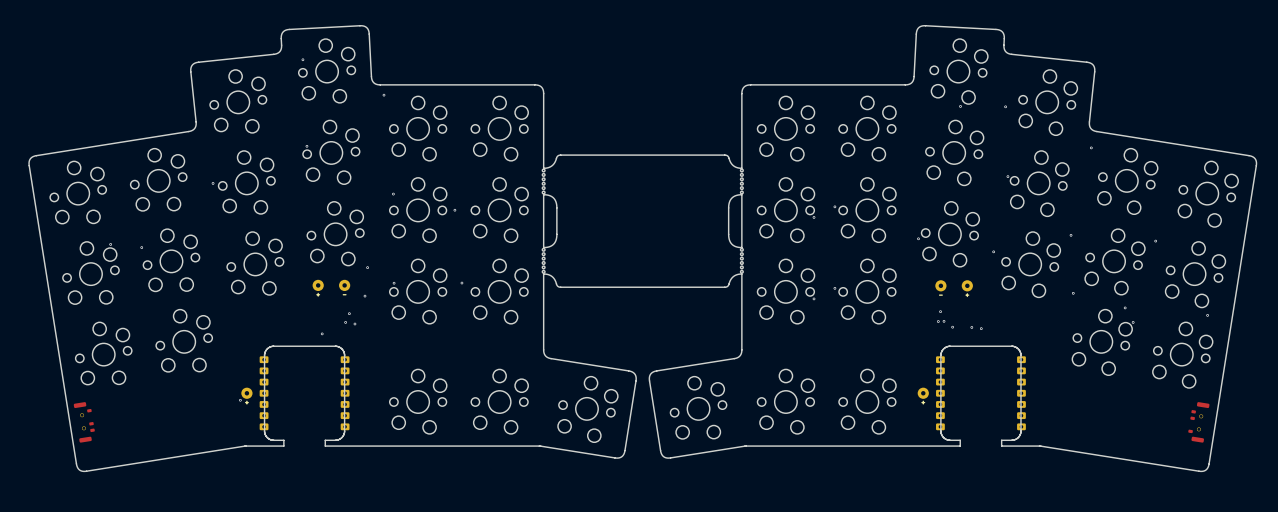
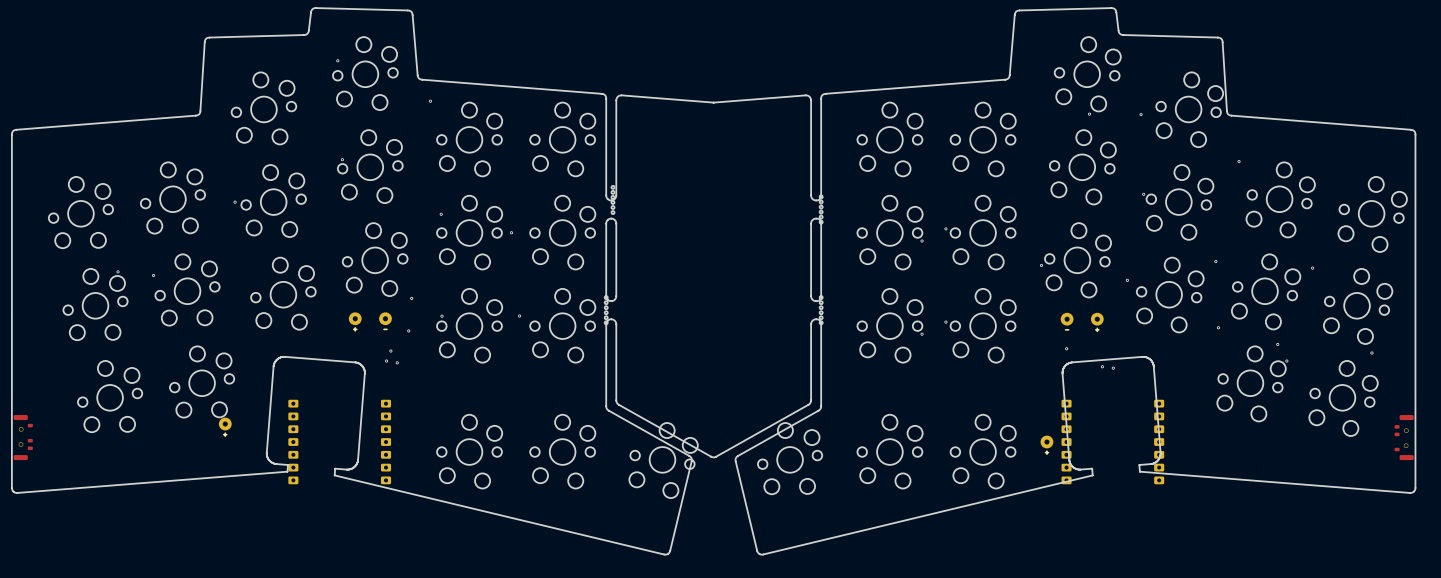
board edge: (359, 25) (287, 29) (281, 34) (281, 48) (276, 53) (194, 63) (190, 70) (196, 123) (191, 130) (36, 155) (29, 159) (29, 165) (76, 463) (80, 470) (86, 471) (244, 446) (283, 446) (283, 440) (269, 439) (264, 431) (264, 354) (267, 348) (273, 346) (336, 346) (343, 351) (344, 432) (338, 439) (325, 440) (325, 446) (539, 446) (620, 457) (624, 450) (635, 375) (629, 371) (551, 358) (545, 355) (543, 349) (543, 274) (551, 276) (557, 285) (560, 287) (725, 287) (733, 276) (741, 274) (741, 349) (740, 355) (734, 358) (655, 371) (649, 375) (660, 451) (665, 457) (745, 446) (960, 446) (960, 440) (946, 439) (941, 432) (942, 351) (949, 346) (1011, 346) (1017, 348) (1020, 354) (1020, 431) (1015, 439) (1001, 440) (1001, 446) (1040, 446) (1200, 471) (1207, 467) (1256, 161) (1248, 155) (1092, 130) (1089, 122) (1094, 69) (1091, 63) (1009, 53) (1004, 48) (1003, 34) (998, 29) (922, 25) (916, 32) (914, 77) (908, 84) (750, 84) (744, 86) (741, 92) (741, 168) (733, 165) (728, 156) (724, 155) (560, 155) (551, 165) (543, 168) (543, 92) (540, 86) (534, 84) (376, 84) (371, 77) (368, 31) (365, 26) (359, 25) -> (316, 8) (311, 10) (308, 31) (305, 34) (206, 38) (200, 111) (197, 115) (16, 129) (12, 131) (11, 487) (14, 492) (287, 471) (288, 464) (272, 463) (266, 454) (275, 361) (284, 356) (355, 362) (361, 365) (364, 373) (357, 460) (351, 468) (335, 468) (334, 475) (666, 554) (670, 550) (691, 458) (606, 408) (606, 324) (611, 319) (616, 323) (617, 403) (713, 457) (810, 403) (811, 323) (815, 319) (820, 321) (820, 408) (735, 458) (757, 551) (761, 554) (1092, 475) (1092, 468) (1076, 468) (1069, 460) (1062, 373) (1065, 365) (1072, 362) (1143, 356) (1152, 361) (1160, 454) (1154, 463) (1139, 464) (1139, 471) (1410, 492) (1415, 489) (1415, 132) (1410, 129) (1229, 115) (1226, 110) (1222, 41) (1220, 38) (1121, 34) (1118, 31) (1116, 10) (1112, 8) (1017, 10) (1014, 14) (1009, 75) (1007, 79) (822, 94) (821, 196) (816, 200) (811, 195) (811, 100) (808, 96) (713, 102) (619, 95) (616, 100) (616, 196) (611, 200) (606, 195) (606, 98) (604, 94) (420, 79) (417, 75) (410, 11) (316, 8)
part position: (741, 181) -> (821, 209)
board edge: (543, 194) (543, 247) (553, 244) (556, 234) (556, 202) (551, 196) (543, 194) -> none
board edge: (741, 194) (741, 247) (731, 244) (728, 234) (729, 202) (733, 196) (741, 194) -> none
board edge: none -> (611, 218) (606, 223) (606, 296) (611, 301) (616, 296) (616, 223) (611, 218)
board edge: none -> (816, 218) (819, 219) (821, 223) (821, 296) (819, 300) (816, 301) (811, 296) (811, 223) (816, 218)
part position: (543, 260) -> (606, 310)
part position: (741, 260) -> (821, 310)
via: (938, 321) -> none
via: (944, 321) -> none
via: (952, 327) -> none
via: (322, 333) -> none
part: none -> (23, 437)
part: none -> (1404, 437)
part position: (246, 393) -> (225, 424)
via: (240, 400) -> none
part: (84, 422) -> none
part: (1198, 422) -> none

